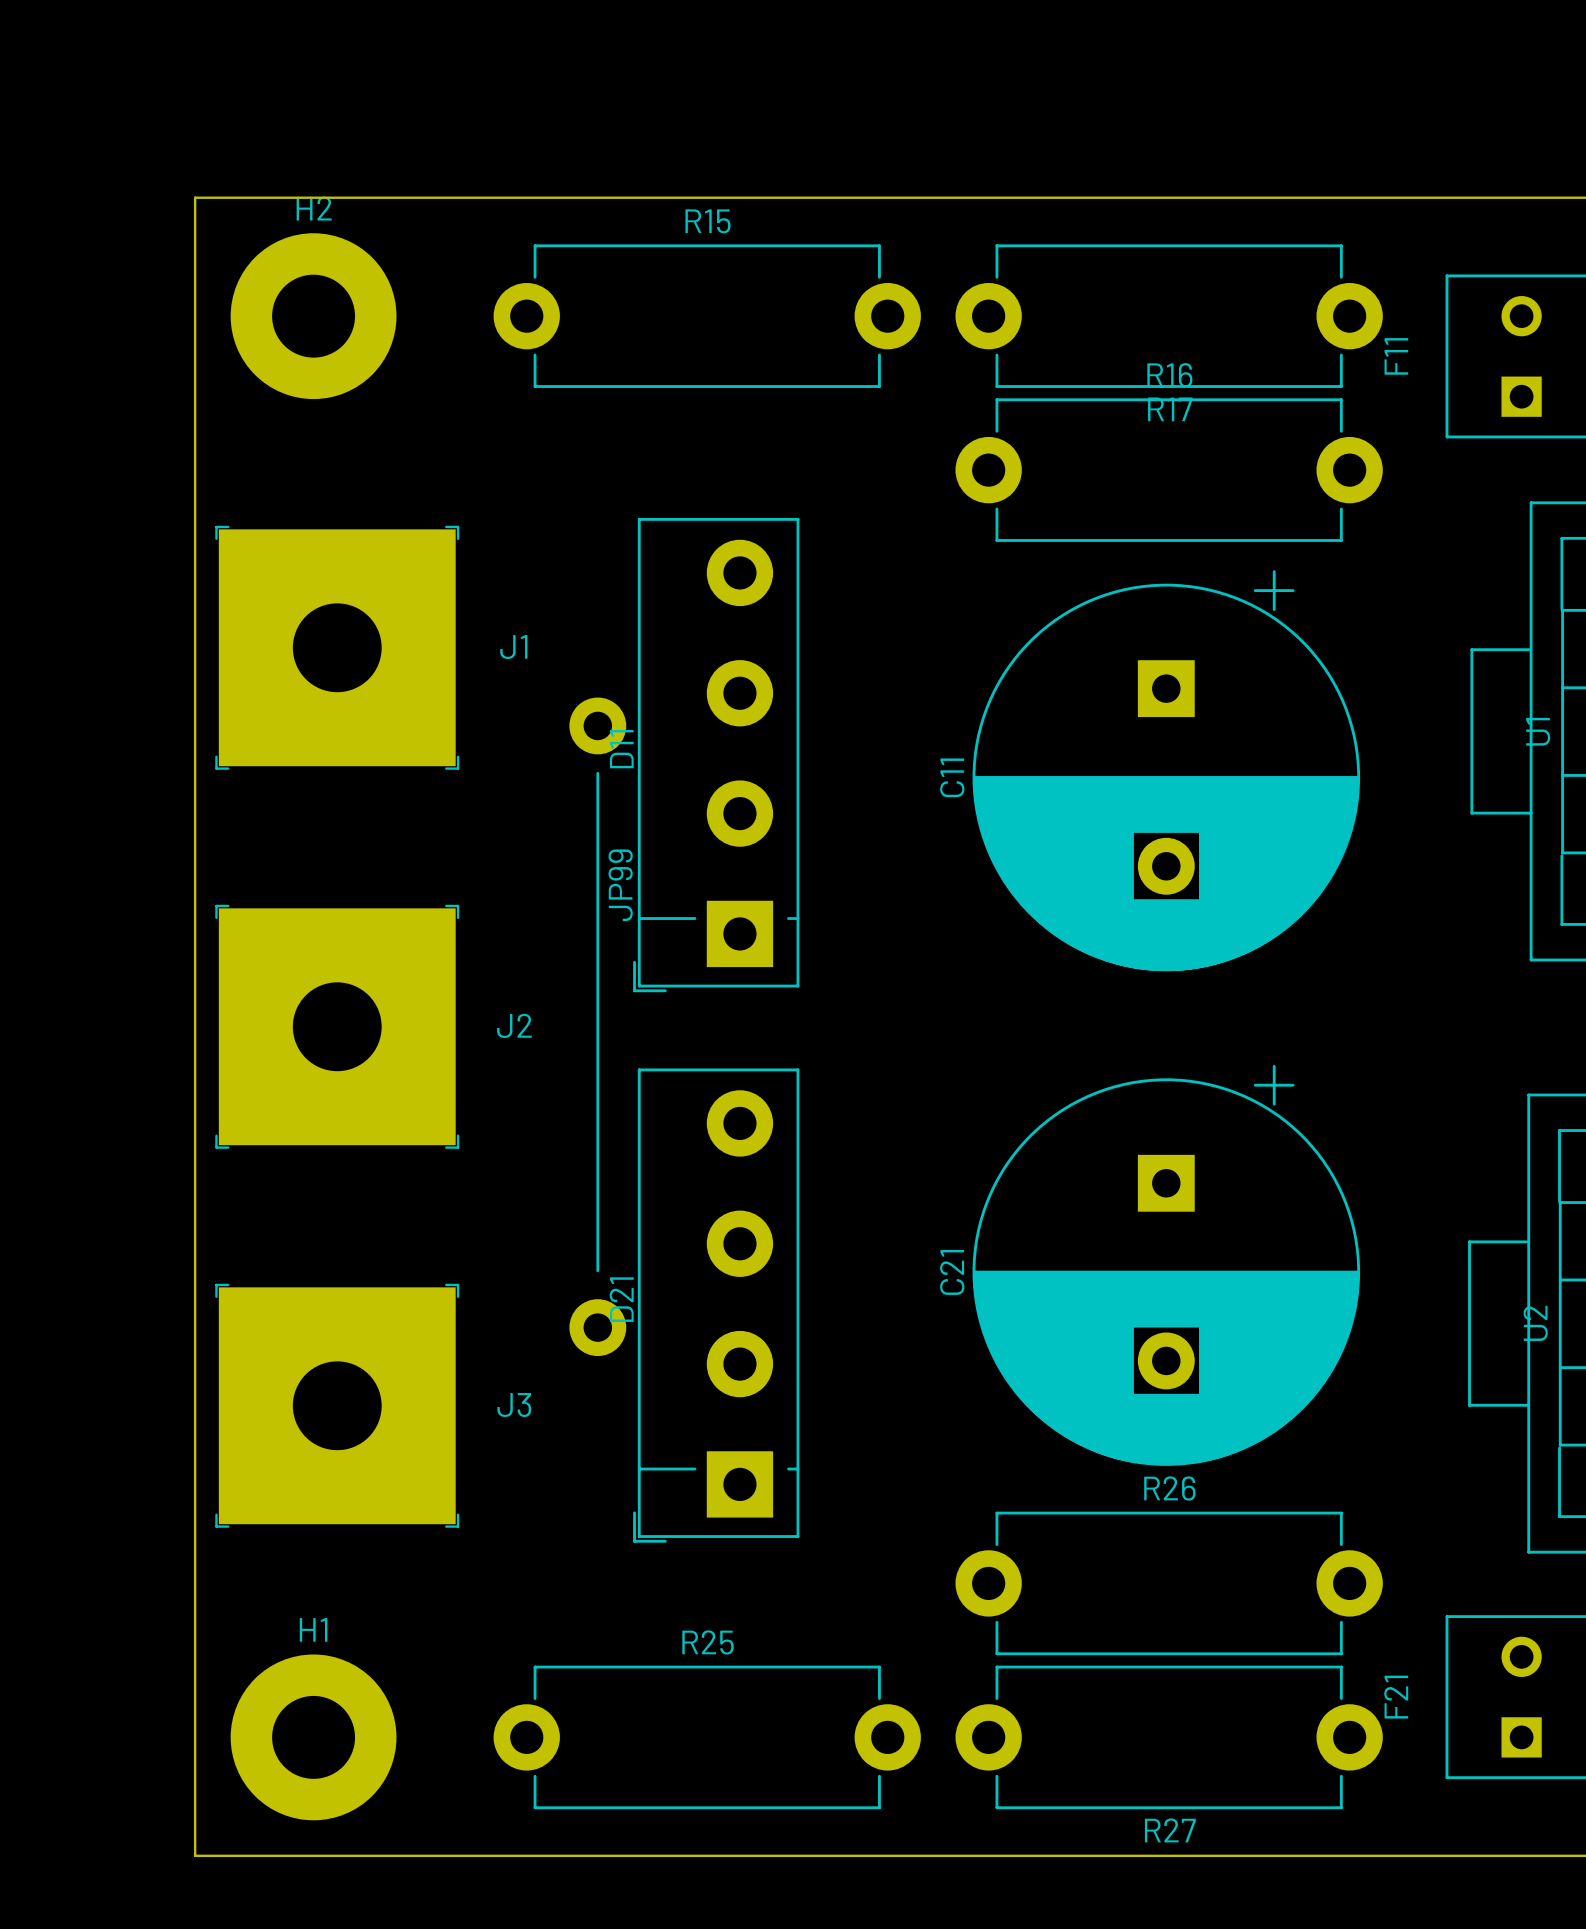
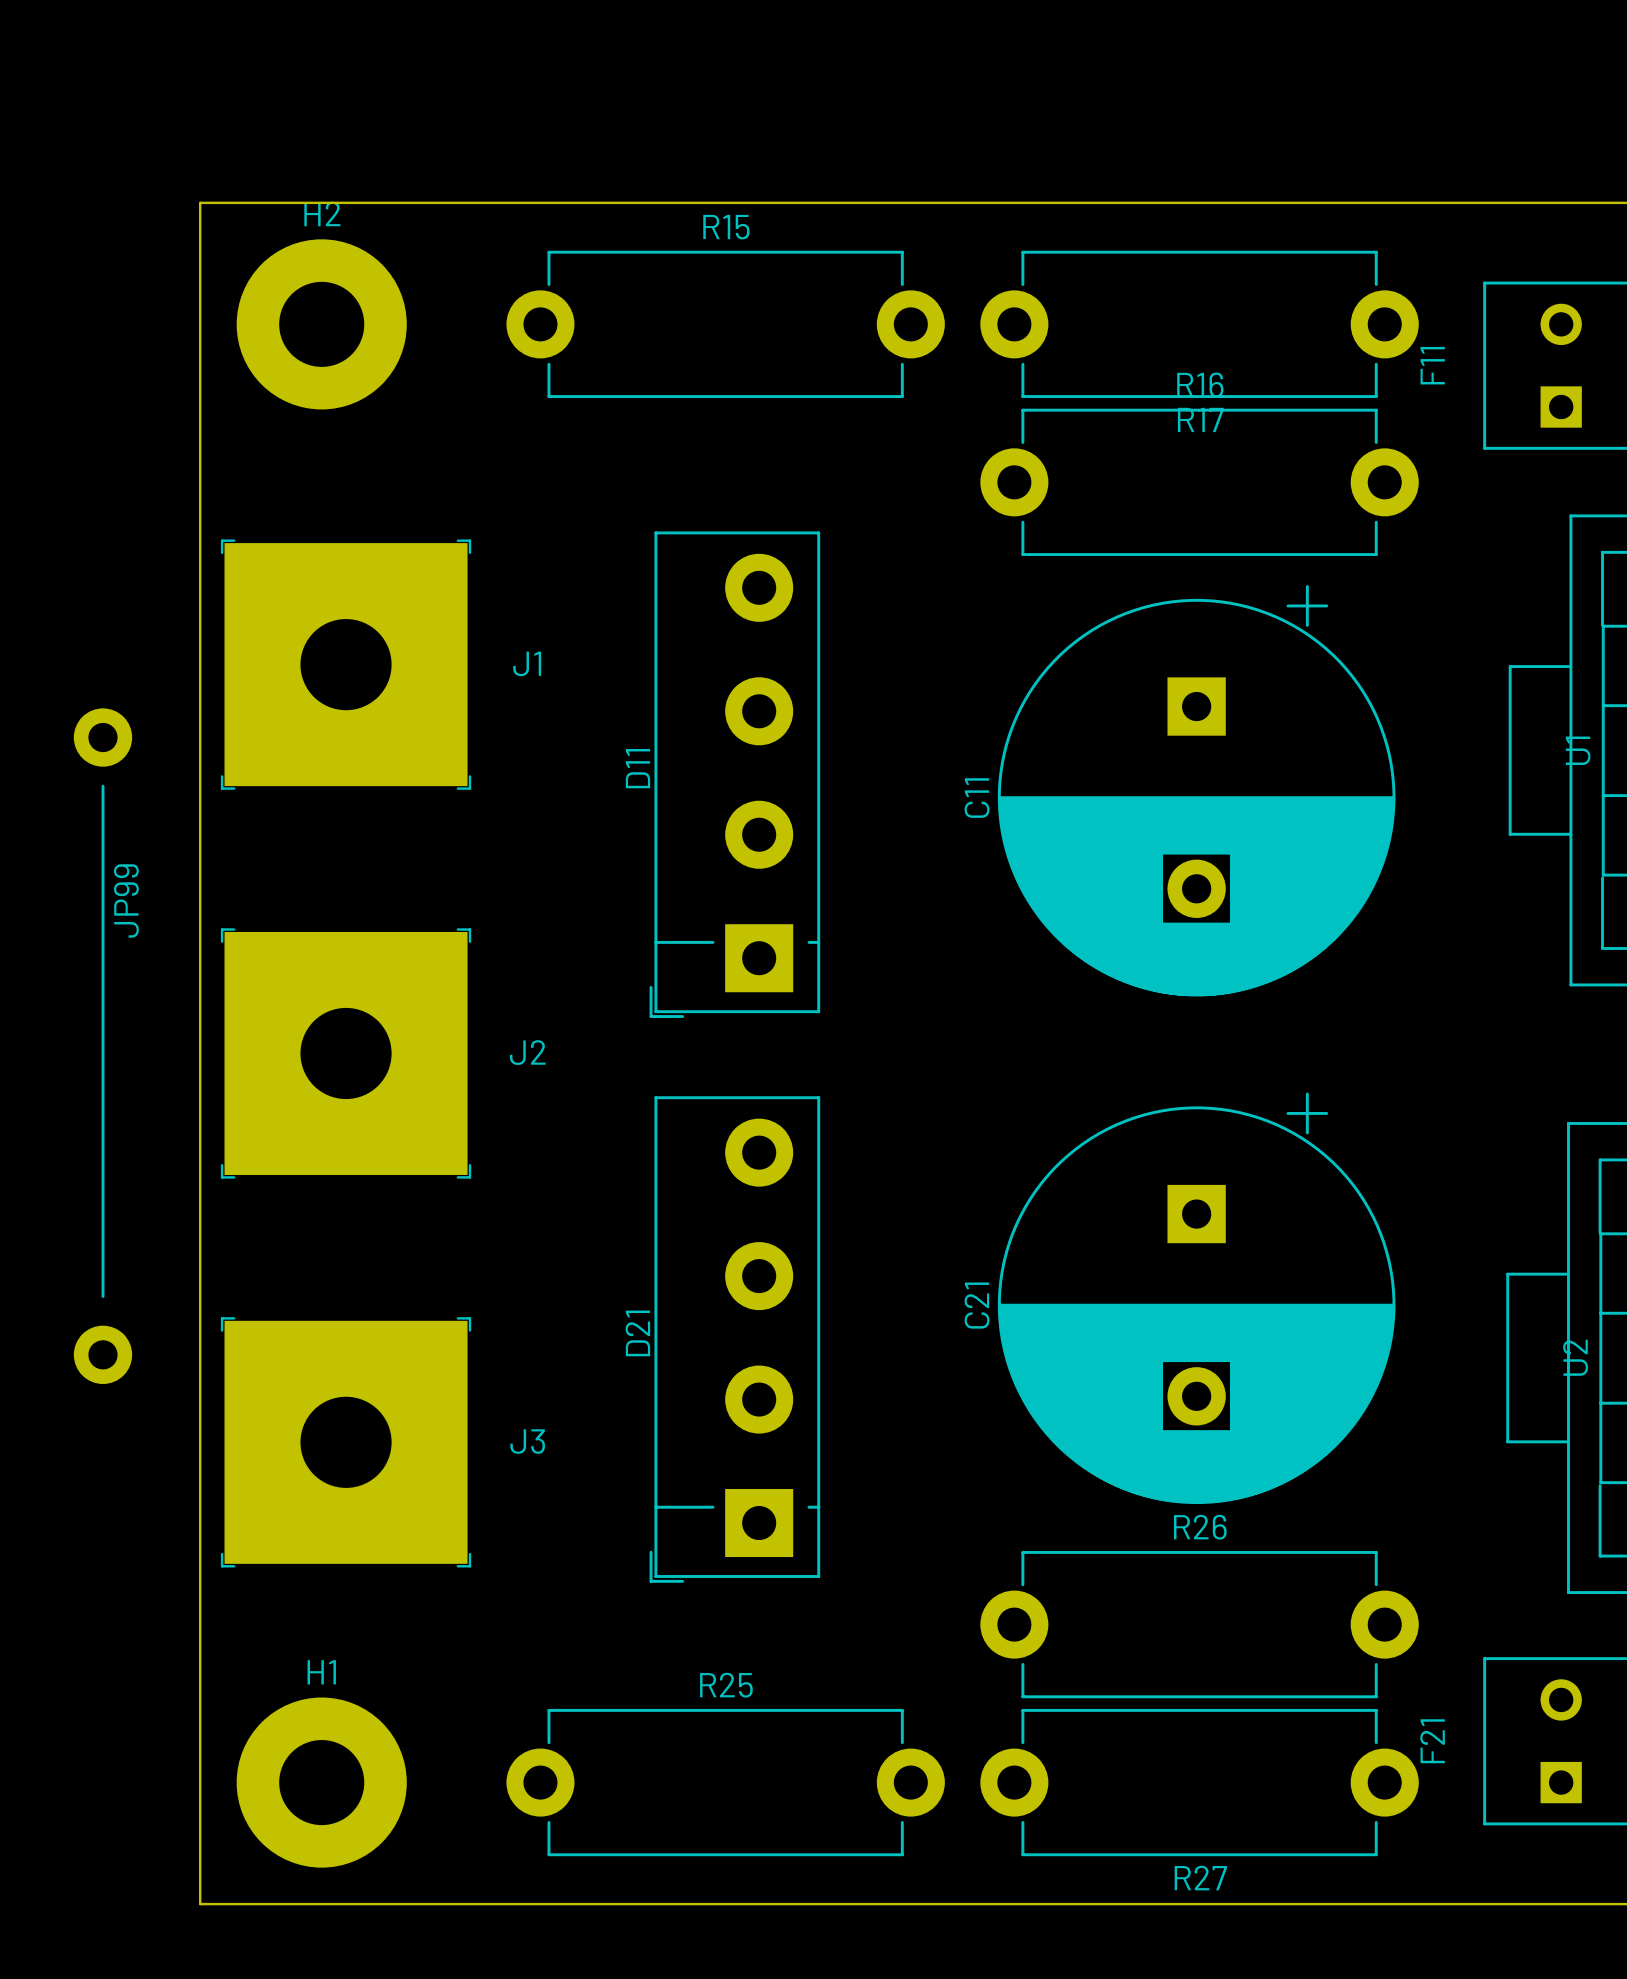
JP99 position: (597, 1026) -> (102, 1046)

